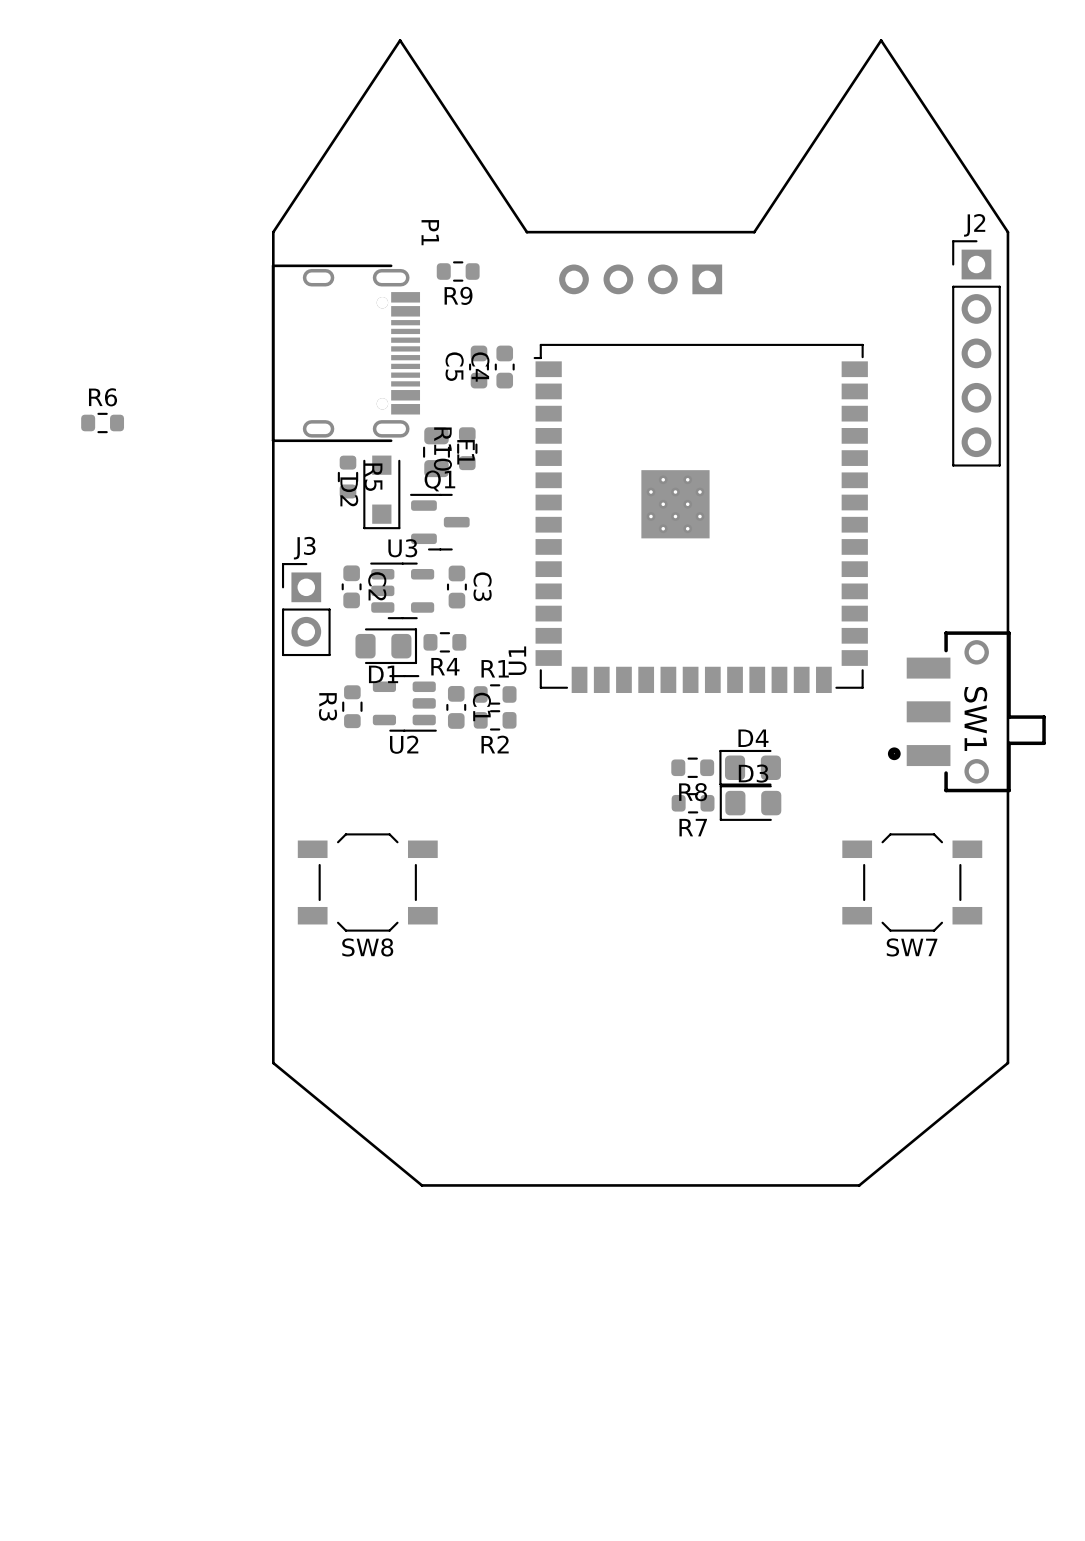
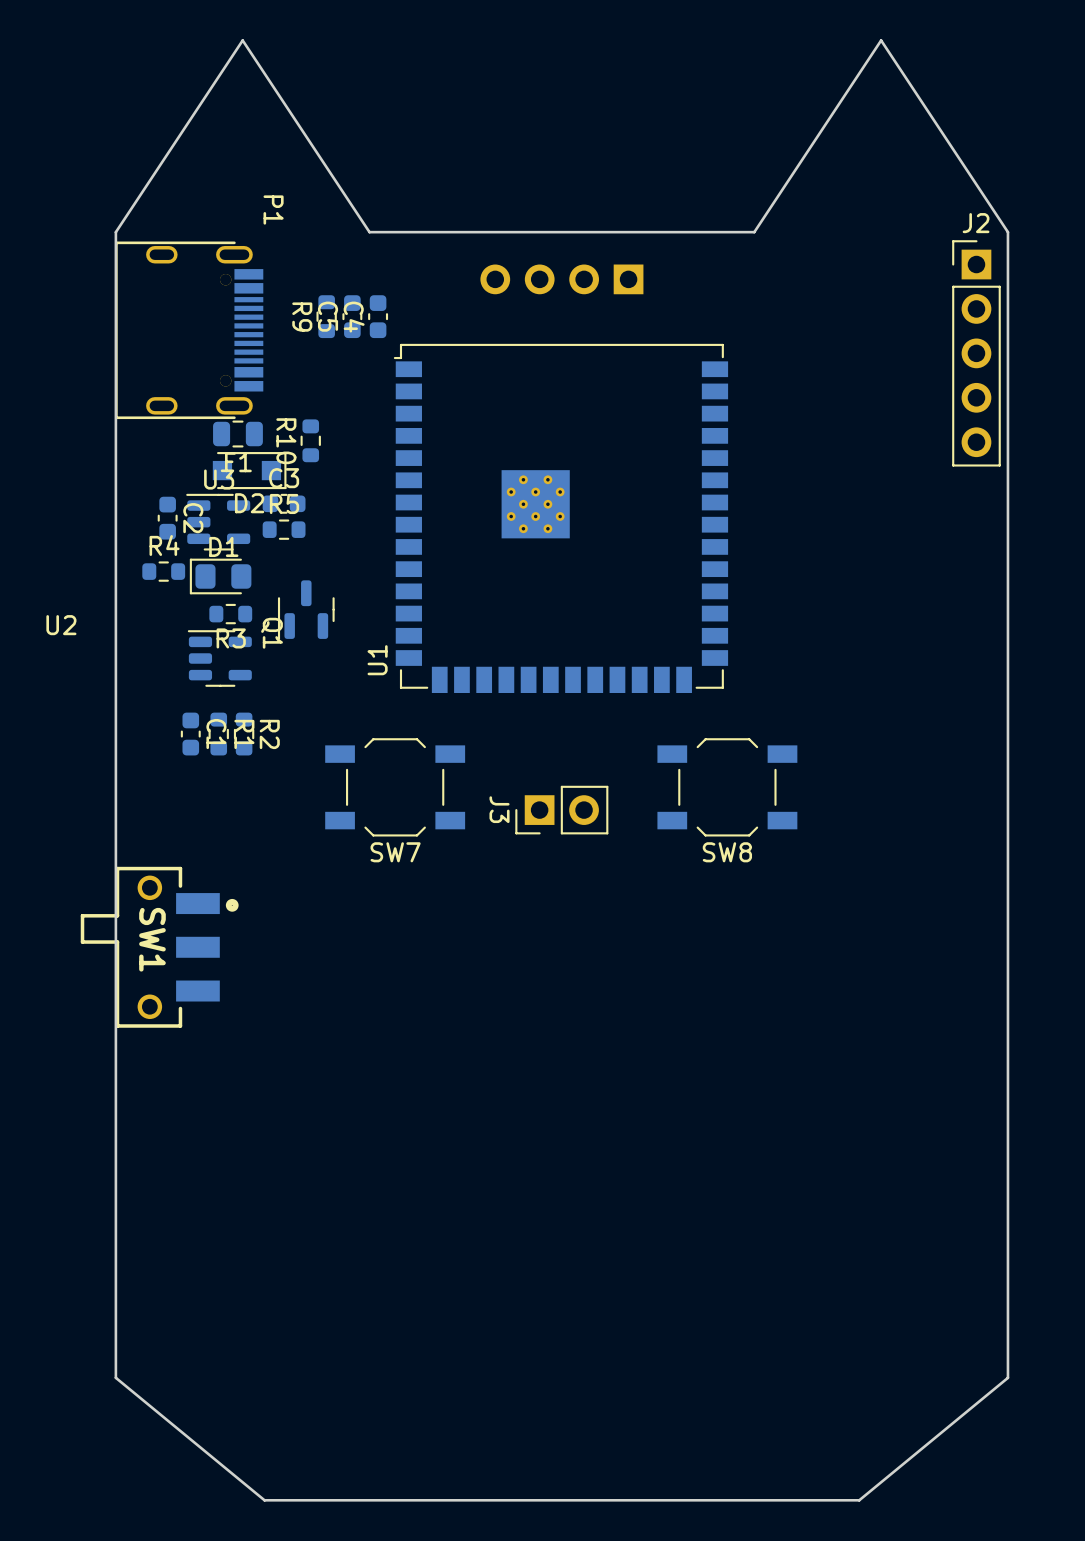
board edge: (526, 232) (400, 40) (273, 232) (273, 1063) (421, 1185) (859, 1185) (1007, 1063) -> (526, 232) (369, 232) (242, 40) (115, 232) (115, 1377) (264, 1500) (859, 1500) (1007, 1377) (1007, 1063)
R9 rotation: 0° (458, 271) -> 90° clockwise (326, 316)
R9 position: (458, 271) -> (326, 316)
part position: (640, 279) -> (561, 279)
P1 position: (345, 353) -> (189, 330)
C5 position: (479, 367) -> (352, 316)
C4 position: (504, 367) -> (378, 316)
R6: (102, 422) -> none
R10 position: (467, 448) -> (310, 440)
F1 rotation: 0° (436, 452) -> 90° clockwise (237, 434)
F1 position: (436, 452) -> (237, 434)
R5 rotation: 0° (348, 477) -> 90° clockwise (284, 529)
R5 position: (348, 477) -> (284, 529)
R5 name position: R5 (373, 477) -> R5 (284, 503)
D2 rotation: 0° (381, 492) -> 90° counterclockwise (249, 470)
D2 position: (381, 492) -> (249, 470)
U1 position: (700, 518) -> (560, 518)
Q1 rotation: 0° (439, 522) -> 90° counterclockwise (306, 610)
Q1 position: (439, 522) -> (306, 610)
C2 position: (351, 586) -> (167, 518)
C3 name position: C3 (482, 586) -> C3 (284, 478)
C3 rotation: 0° (456, 587) -> 90° clockwise (284, 503)
C3 position: (456, 587) -> (284, 503)
U3 position: (402, 590) -> (218, 522)
J3 rotation: 0° (306, 609) -> 90° counterclockwise (561, 810)
J3 position: (306, 609) -> (561, 810)
R4 position: (444, 642) -> (163, 571)
D1 rotation: 0° (386, 646) -> 180° (220, 576)
D1 position: (386, 646) -> (220, 576)
R4 name position: R4 (445, 666) -> R4 (164, 545)
R1 rotation: 0° (495, 694) -> 90° clockwise (218, 734)
R1 position: (495, 694) -> (218, 734)
U2 rotation: 0° (404, 703) -> 180° (219, 658)
U2 position: (404, 703) -> (219, 658)
R3 name position: R3 (328, 706) -> R3 (231, 638)
R3 rotation: 0° (352, 706) -> 90° clockwise (230, 614)
R3 position: (352, 706) -> (230, 614)
C1 position: (456, 707) -> (190, 734)
SW1 rotation: 0° (966, 711) -> 180° (159, 947)
SW1 position: (966, 711) -> (159, 947)
R2 rotation: 0° (495, 720) -> 90° clockwise (244, 734)
R2 position: (495, 720) -> (244, 734)
U2 name position: U2 (404, 744) -> U2 (61, 625)
R2 name position: R2 (495, 744) -> R2 (269, 734)
R8: (692, 767) -> none
D4: (750, 767) -> none
R7: (693, 803) -> none
D3: (750, 803) -> none
SW8 position: (367, 882) -> (727, 787)
SW7 position: (912, 882) -> (395, 787)

